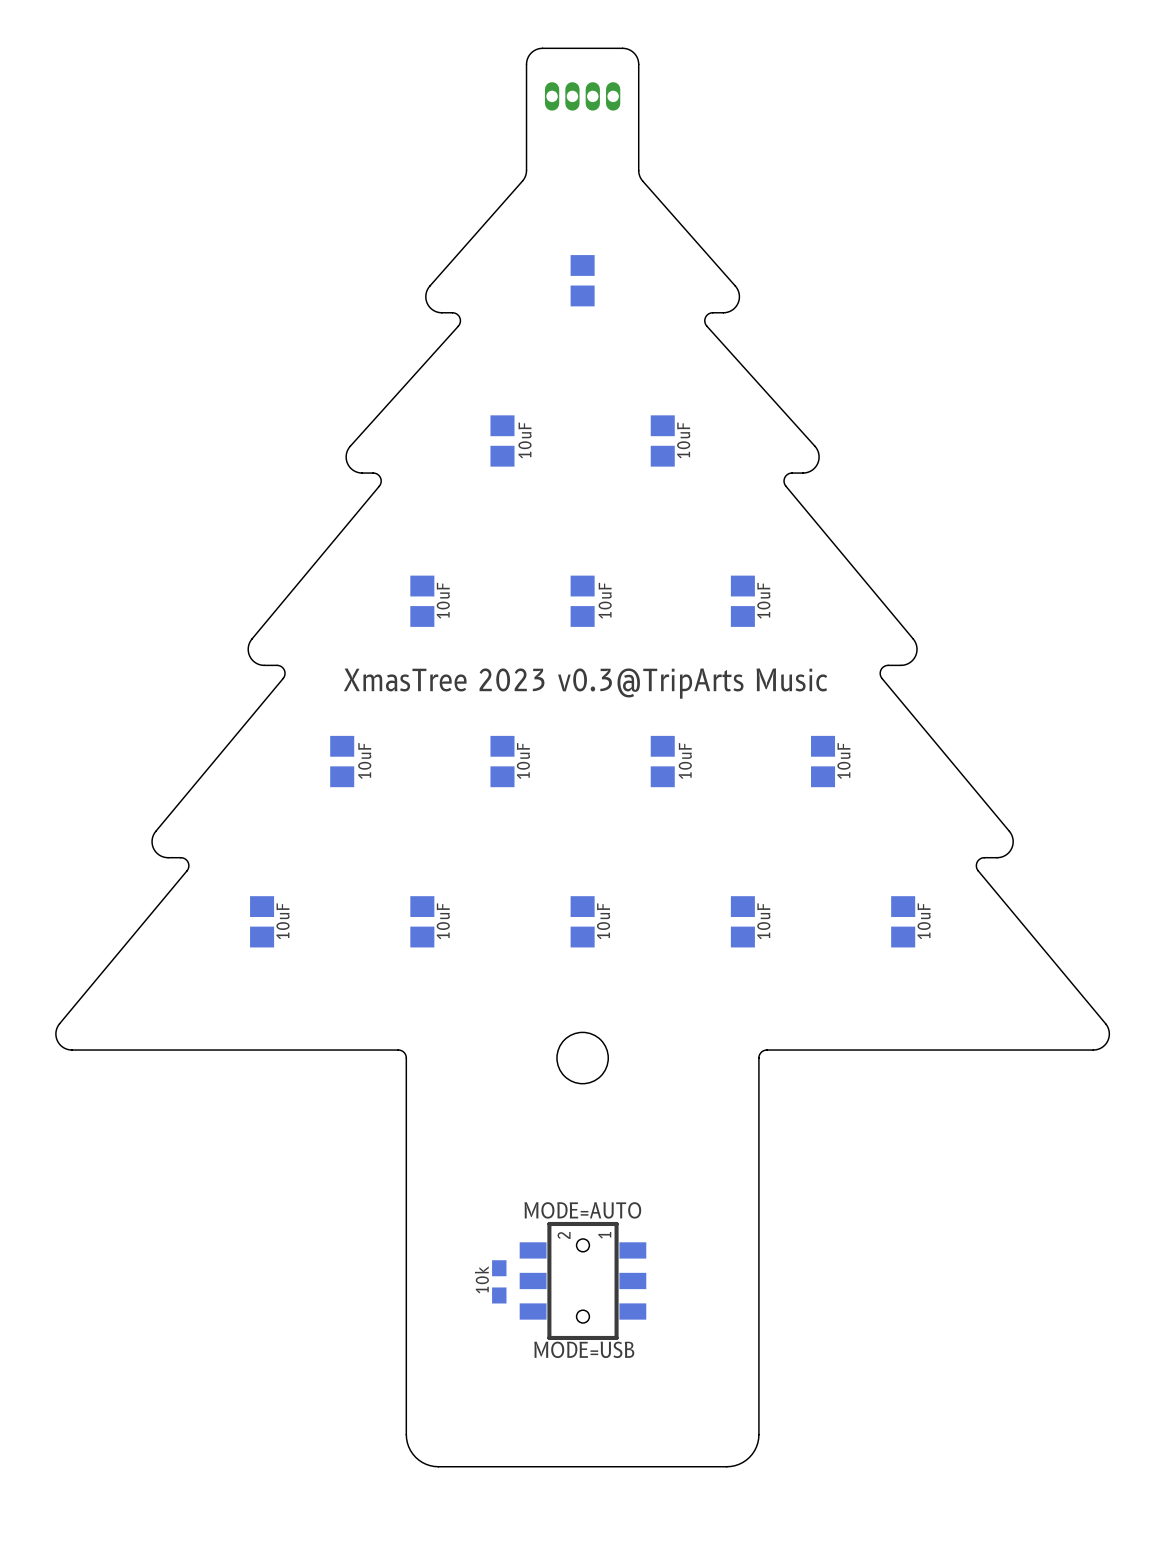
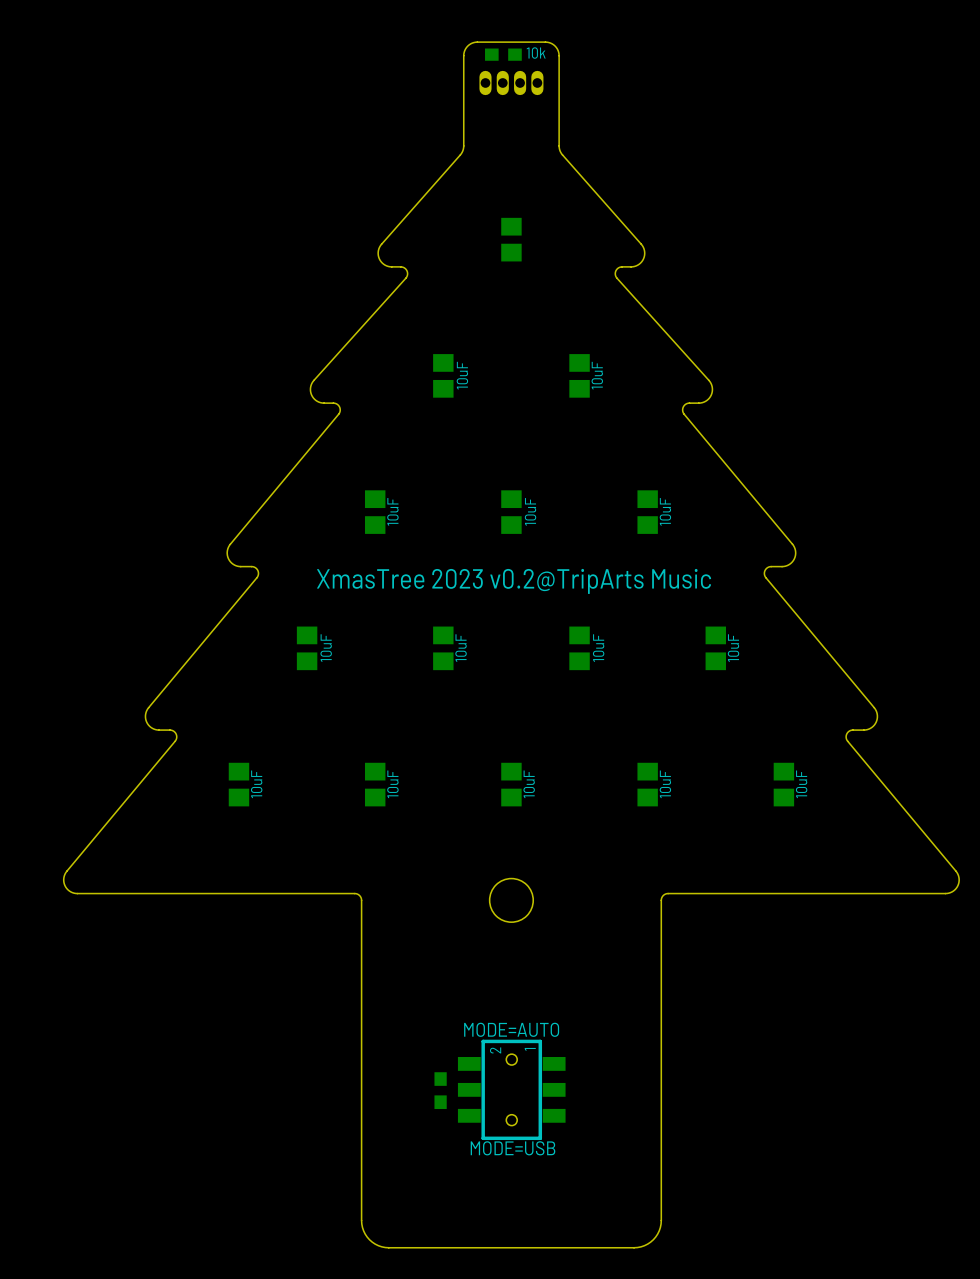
text: none -> 10k (536, 53)
part: none -> (503, 54)
text: XmasTree 2023 v0.3@TripArts Music (585, 683) -> XmasTree 2023 v0.2@TripArts Music (514, 581)
text: 10k (481, 1279) -> none

